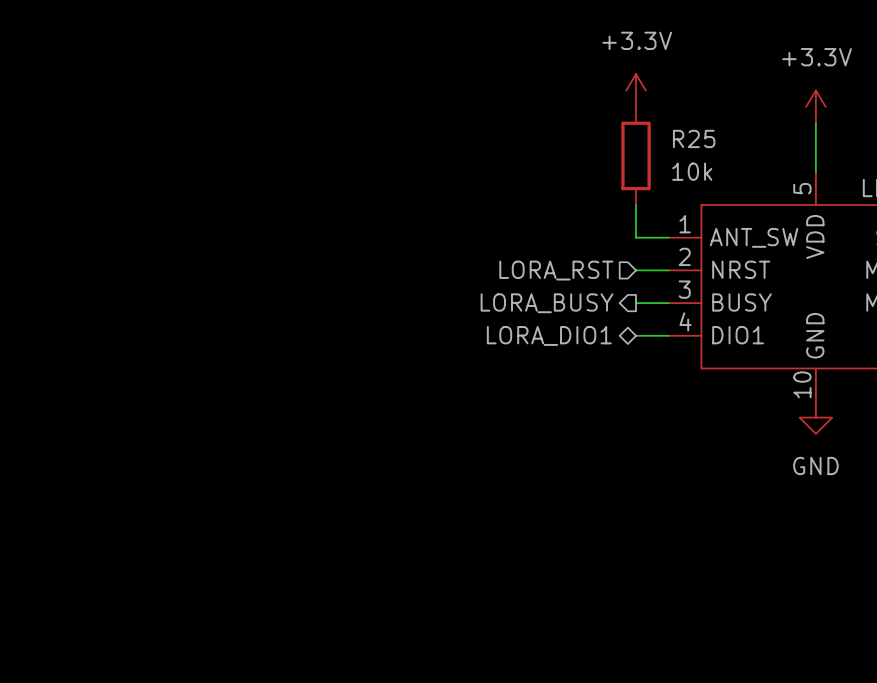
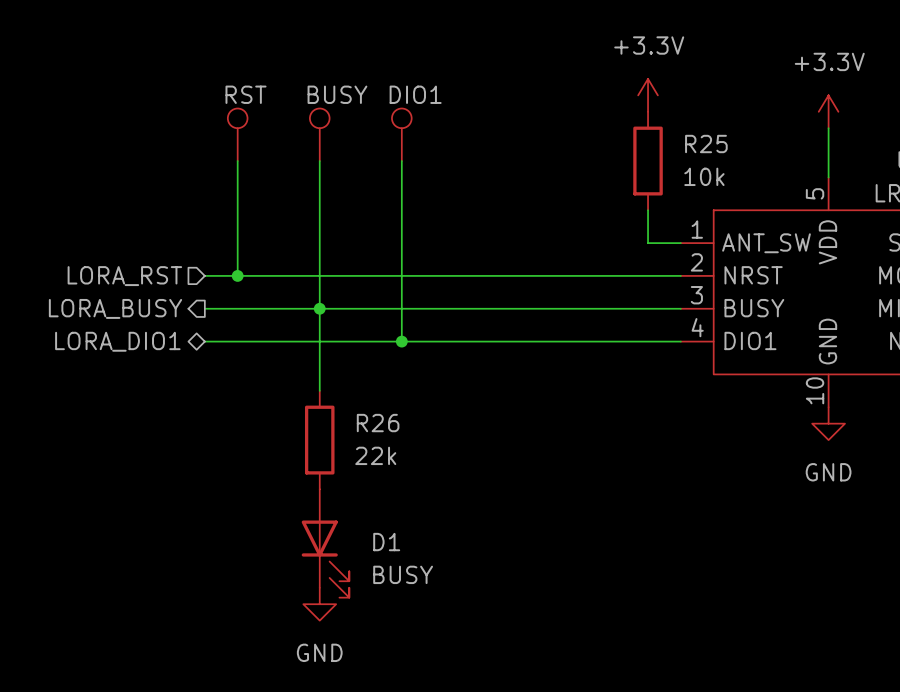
part: none -> RST (237, 134)
part: none -> BUSY (319, 134)
part: none -> DIO1 (401, 134)
wire: none -> (237, 161) (237, 275)
wire: none -> (319, 161) (319, 390)
wire: none -> (401, 161) (401, 341)
hierarchical label: none -> LORA_RST (124, 276)
wire: none -> (204, 275) (648, 275)
junction: none -> (237, 275)
hierarchical label: LORA_RST (556, 270) -> none
hierarchical label: none -> LORA_BUSY (115, 308)
wire: none -> (204, 308) (648, 308)
junction: none -> (319, 308)
hierarchical label: LORA_BUSY (547, 303) -> none
hierarchical label: none -> LORA_DIO1 (117, 341)
wire: none -> (204, 341) (648, 341)
junction: none -> (401, 341)
hierarchical label: LORA_DIO1 (549, 335) -> none
R26: none -> 22k (319, 440)
D1: none -> BUSY (325, 543)
power symbol: none -> GND (319, 604)

